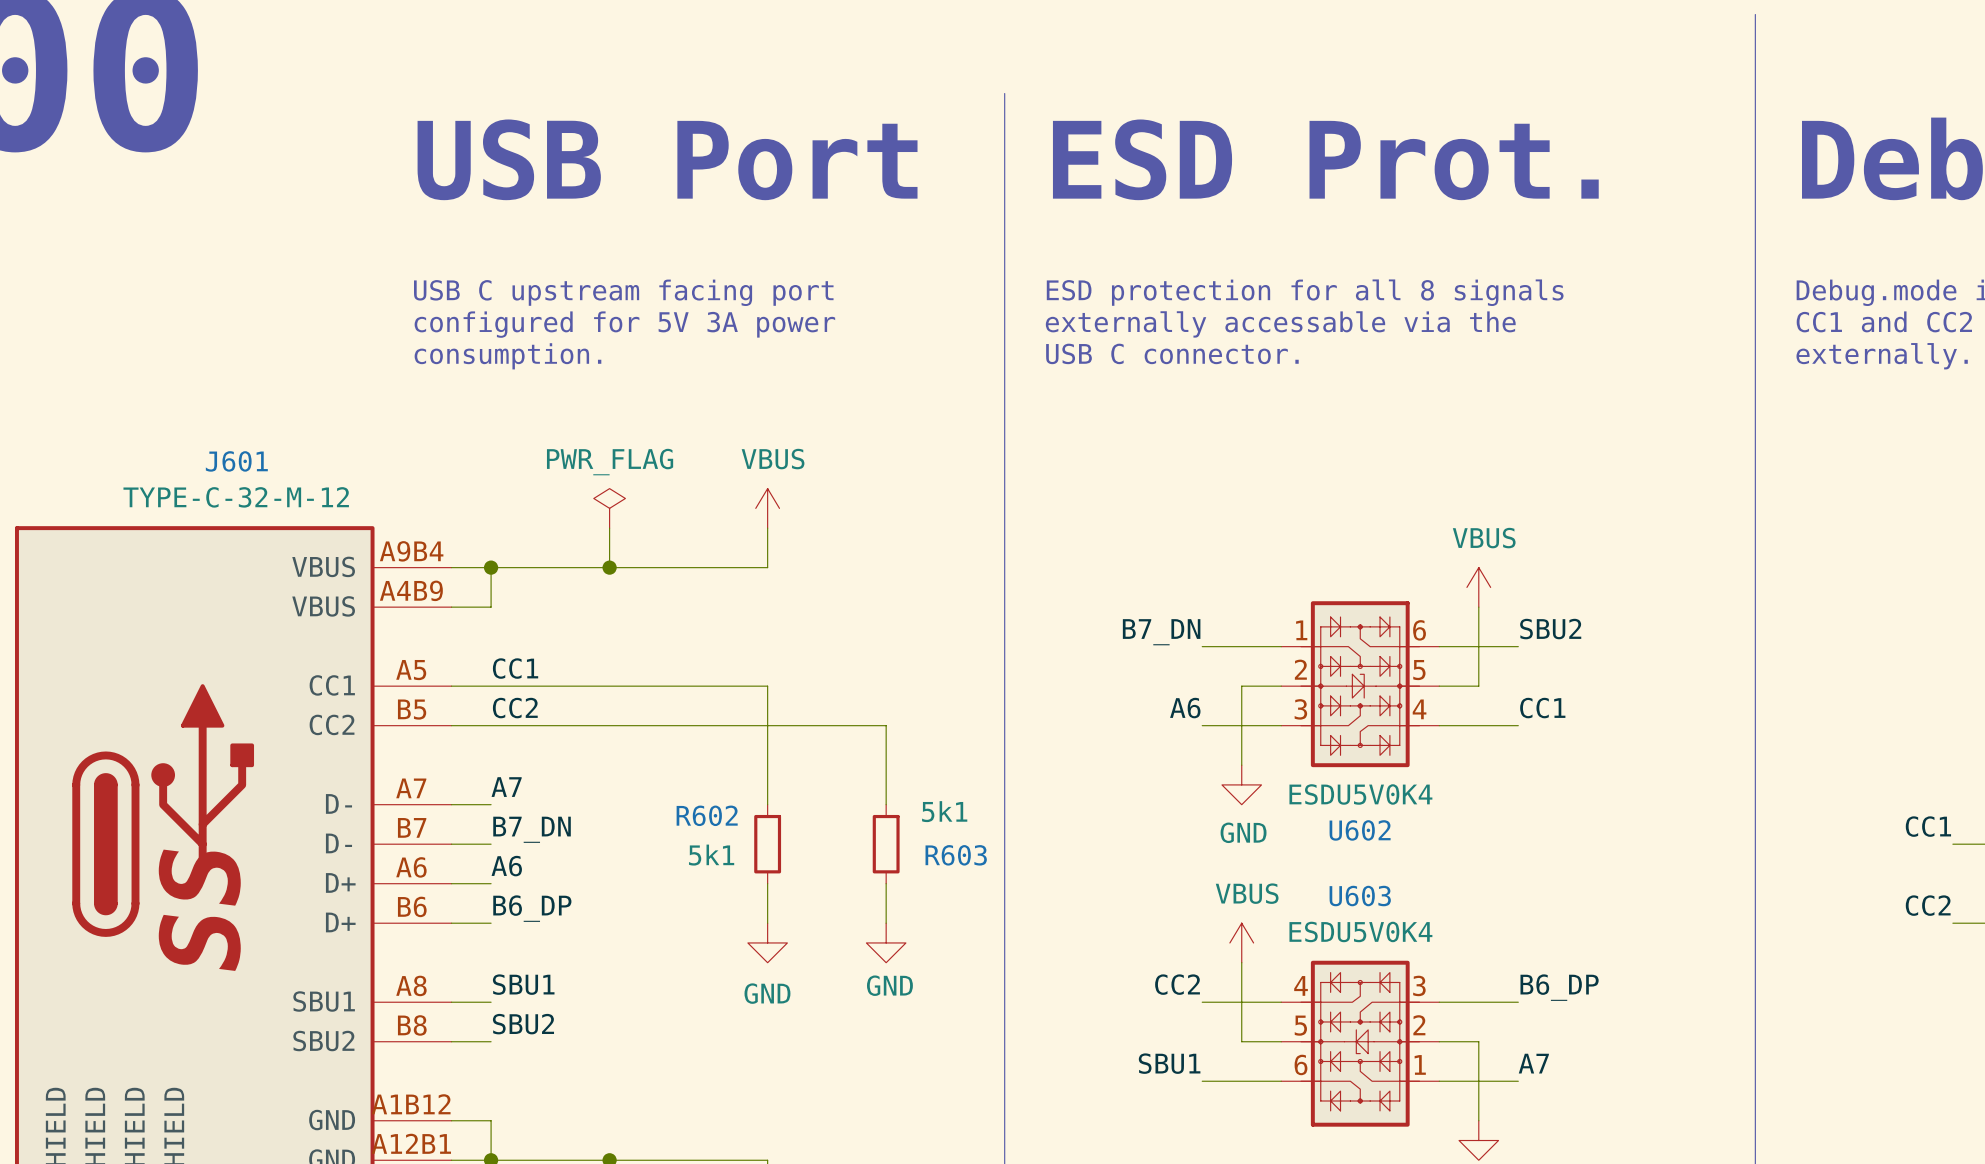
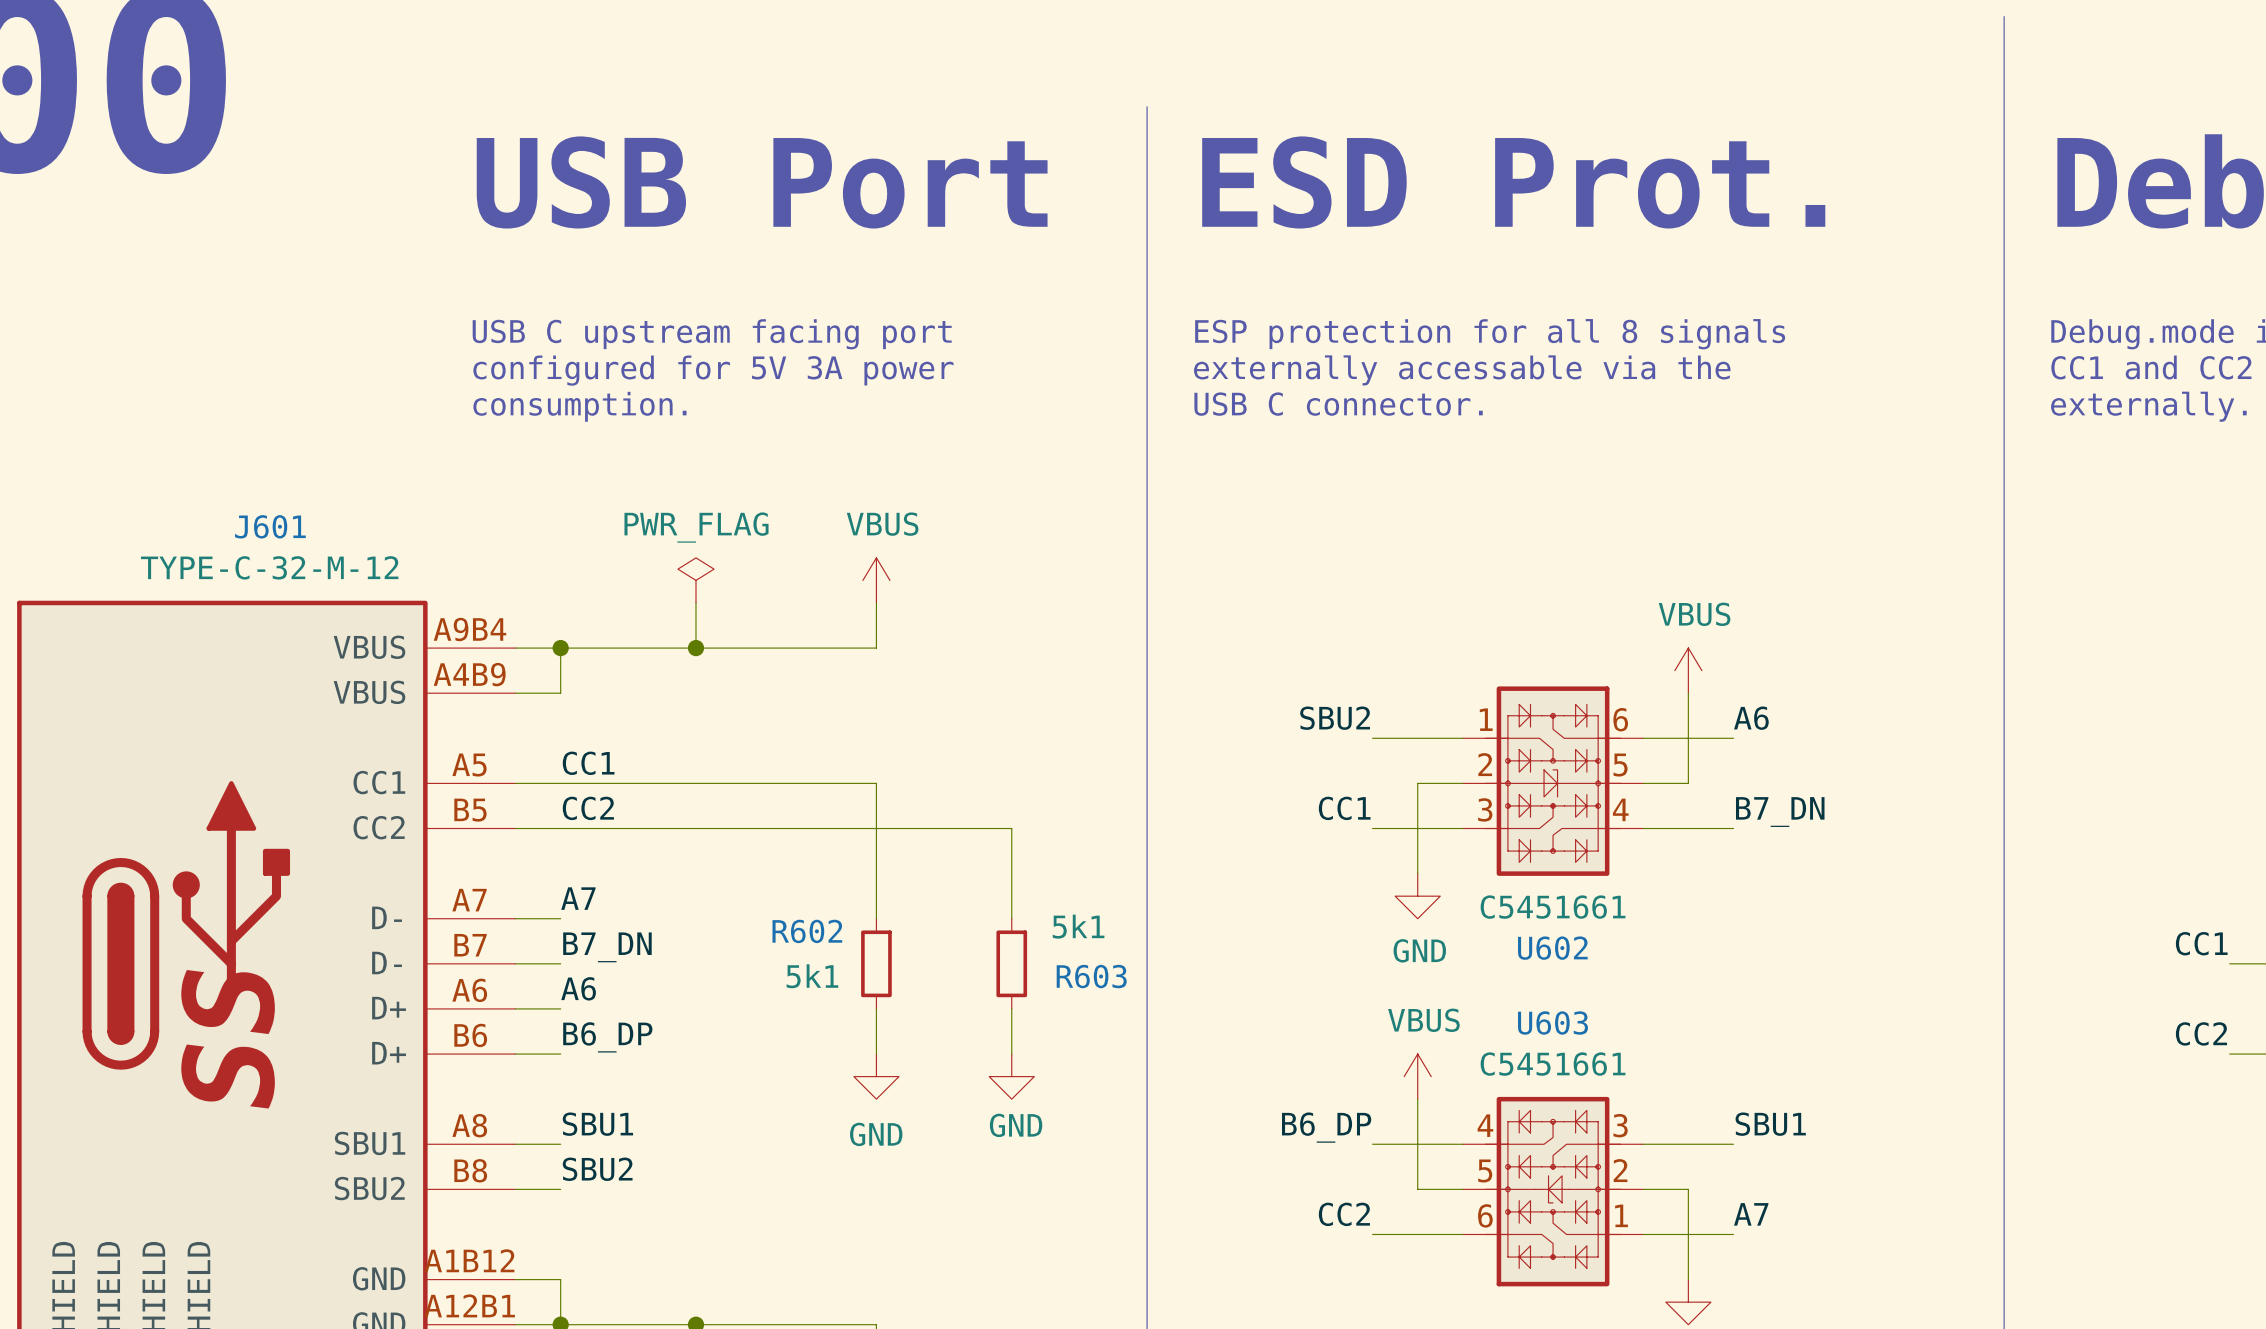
text: ESD protection for all 8 signals (1305, 292) -> ESP protection for all 8 signals (1490, 334)
label: SBU2 (1550, 629) -> A6 (1751, 718)
label: B7_DN (1161, 632) -> SBU2 (1335, 718)
label: A6 (1185, 708) -> CC1 (1344, 808)
label: CC1 (1542, 708) -> B7_DN (1780, 812)
U602 value: ESDU5V0K4 (1360, 794) -> C5451661 (1553, 907)
U603 value: ESDU5V0K4 (1360, 931) -> C5451661 (1553, 1064)
label: CC2 (1177, 984) -> B6_DP (1326, 1127)
label: B6_DP (1559, 987) -> SBU1 (1770, 1124)
label: SBU1 (1169, 1063) -> CC2 (1344, 1214)

